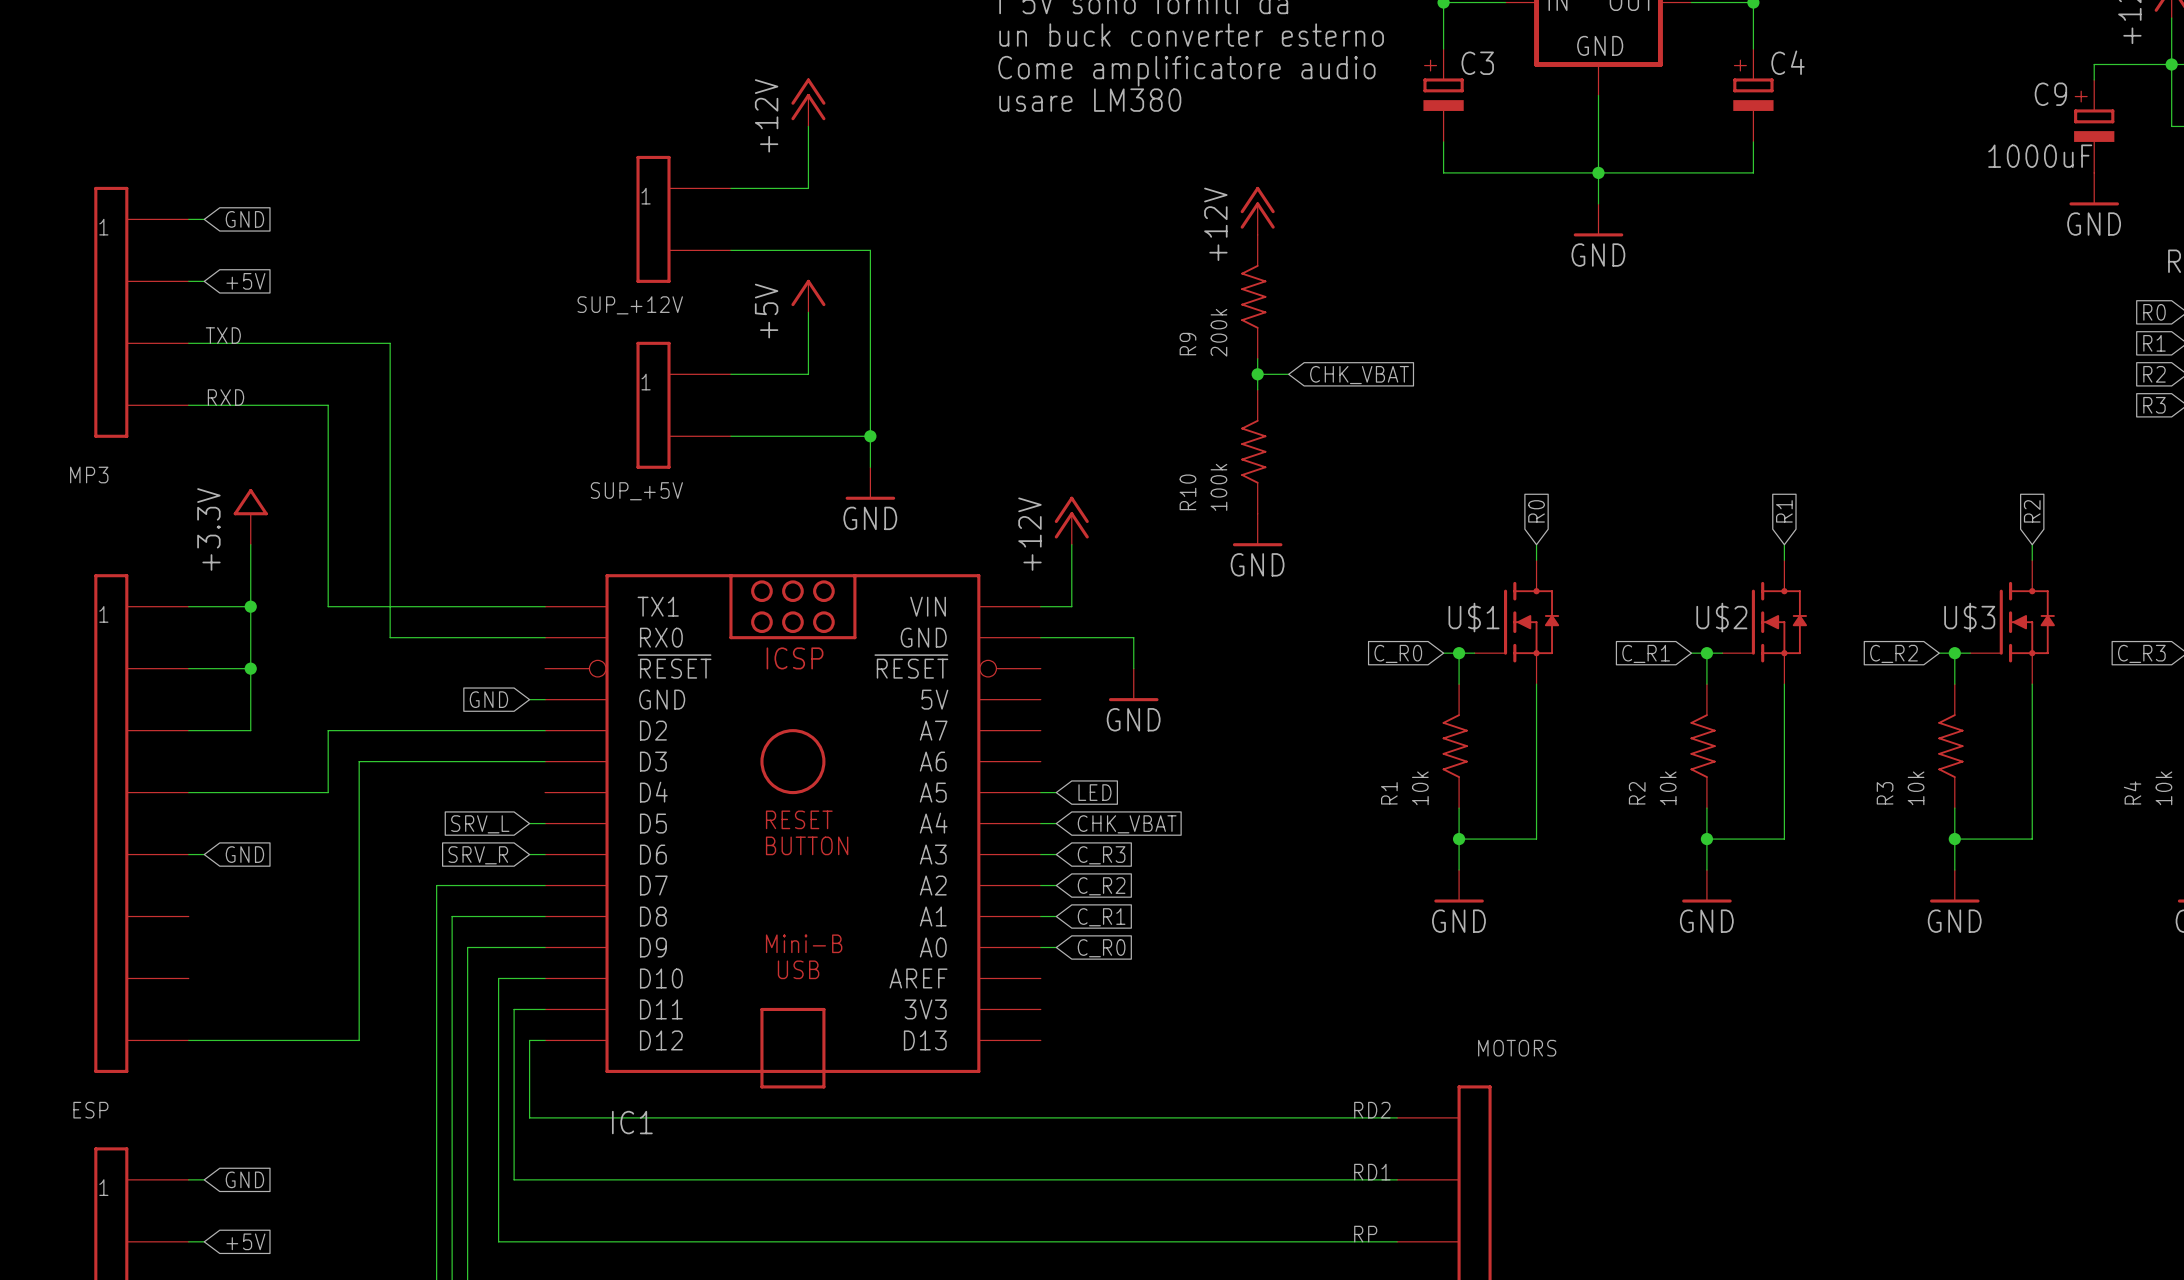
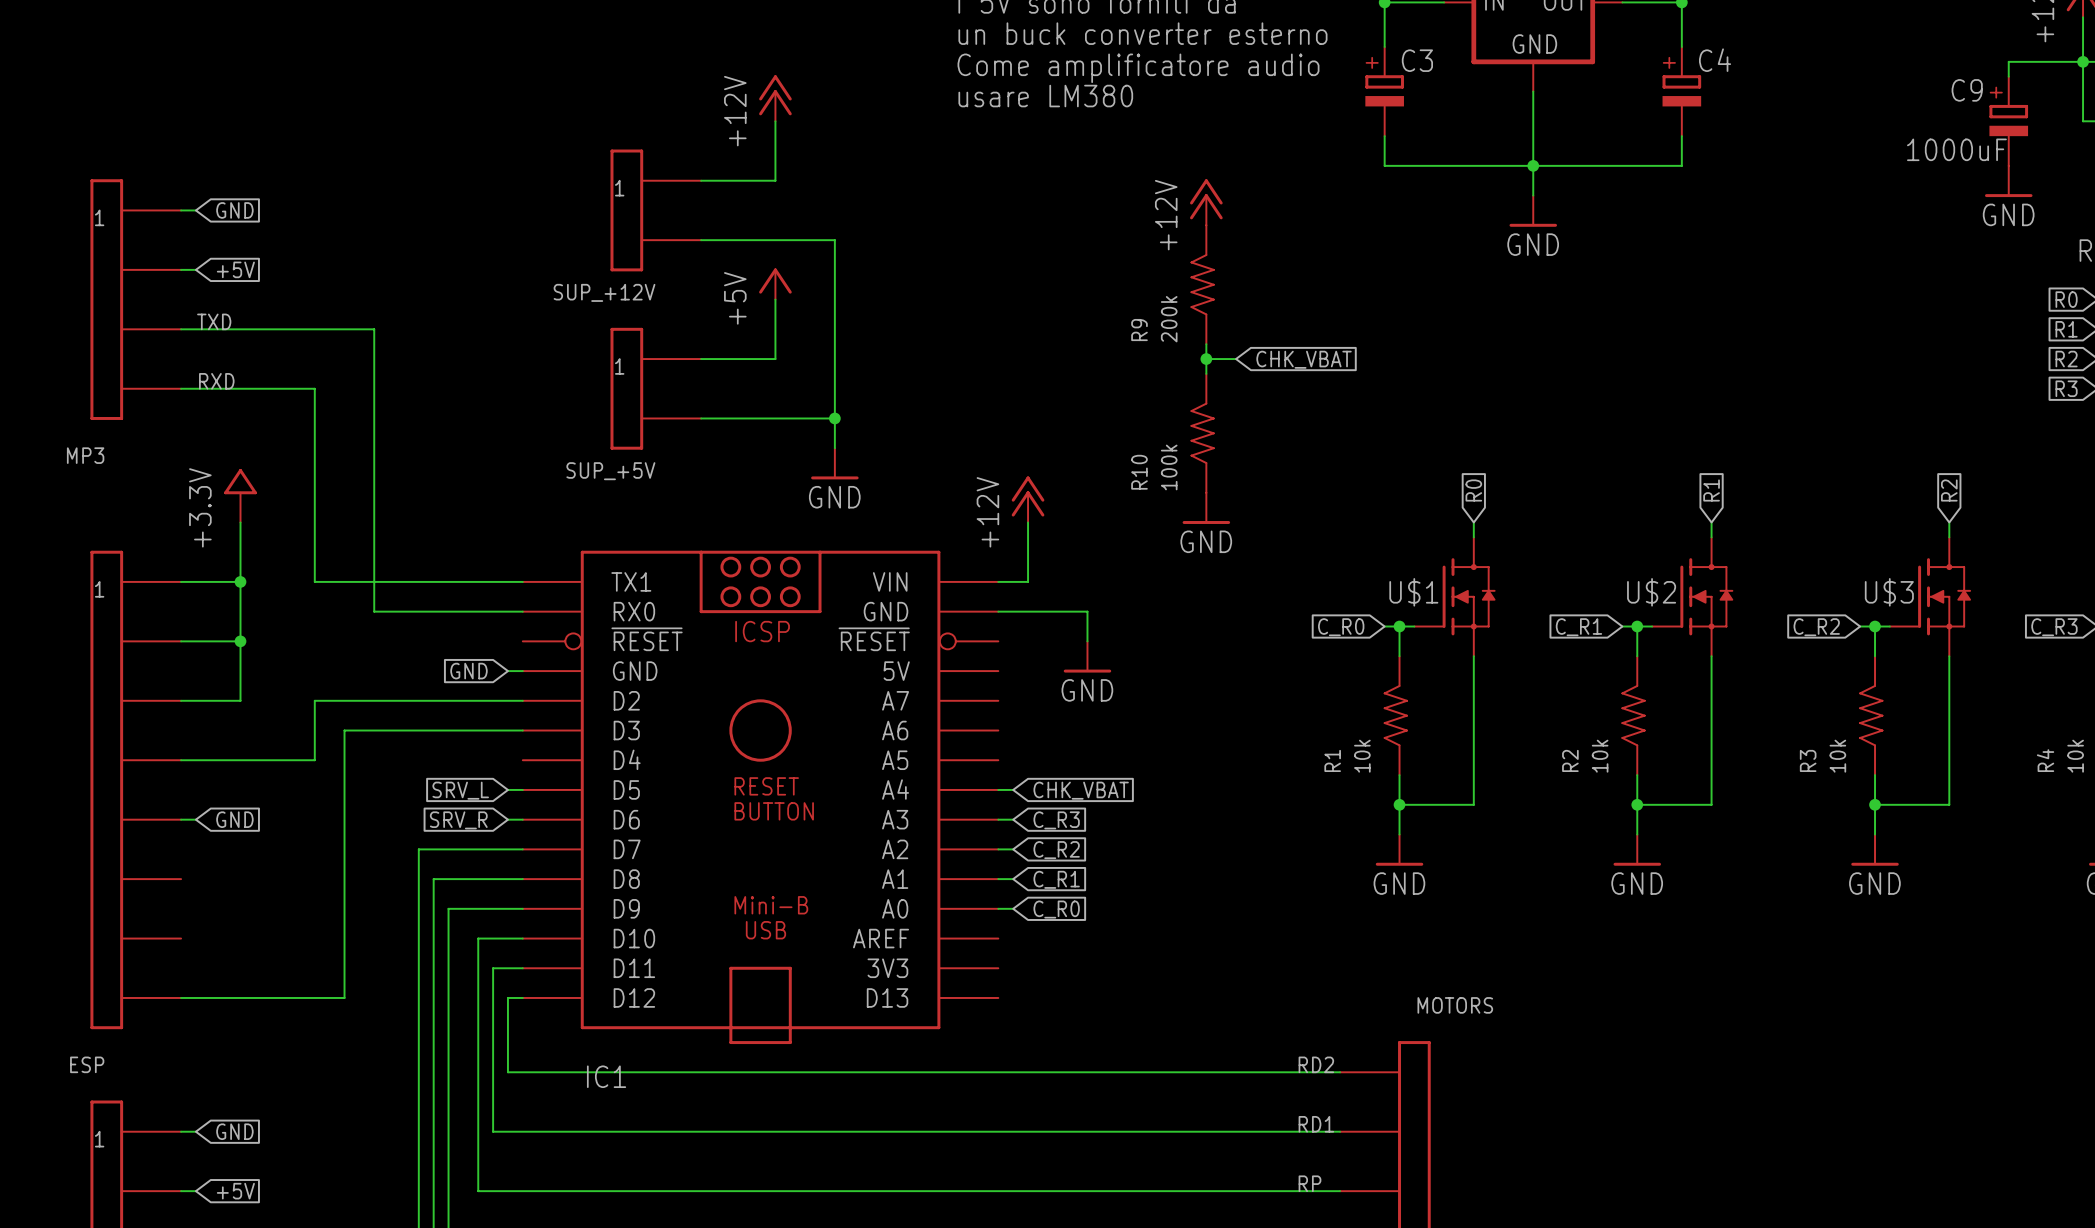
wire: (1040, 792) (1056, 792) -> none
global label: LED (1094, 792) -> none

